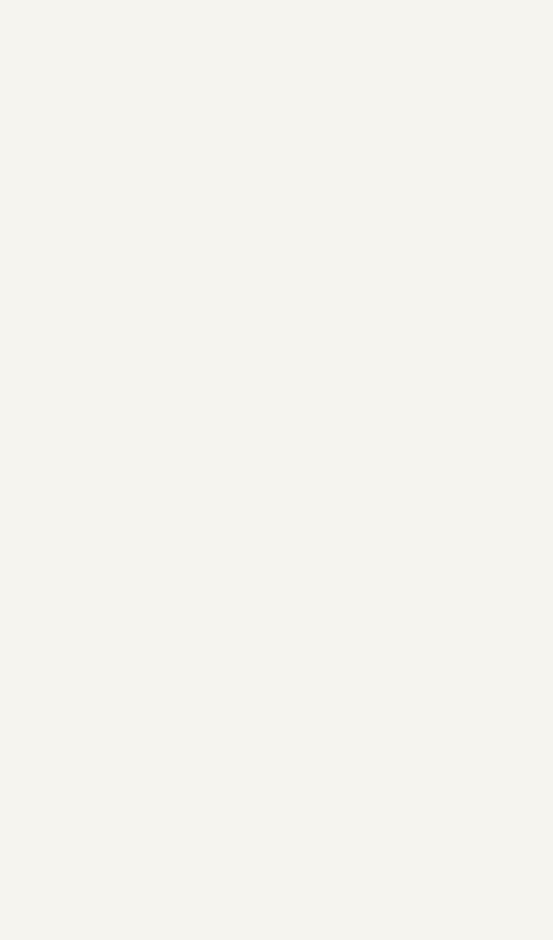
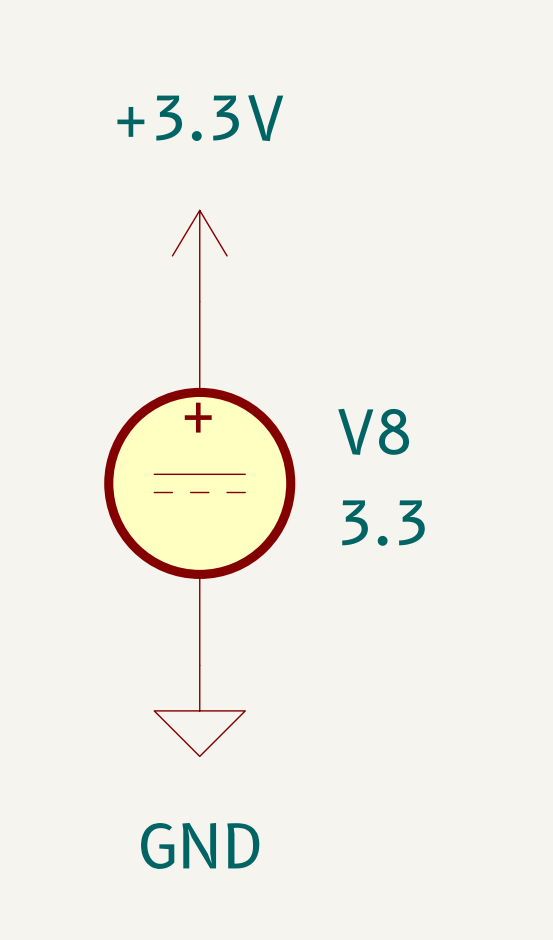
power symbol: none -> +3.3V (199, 255)
V8: none -> 3.3 (199, 483)
power symbol: none -> GND (199, 710)

